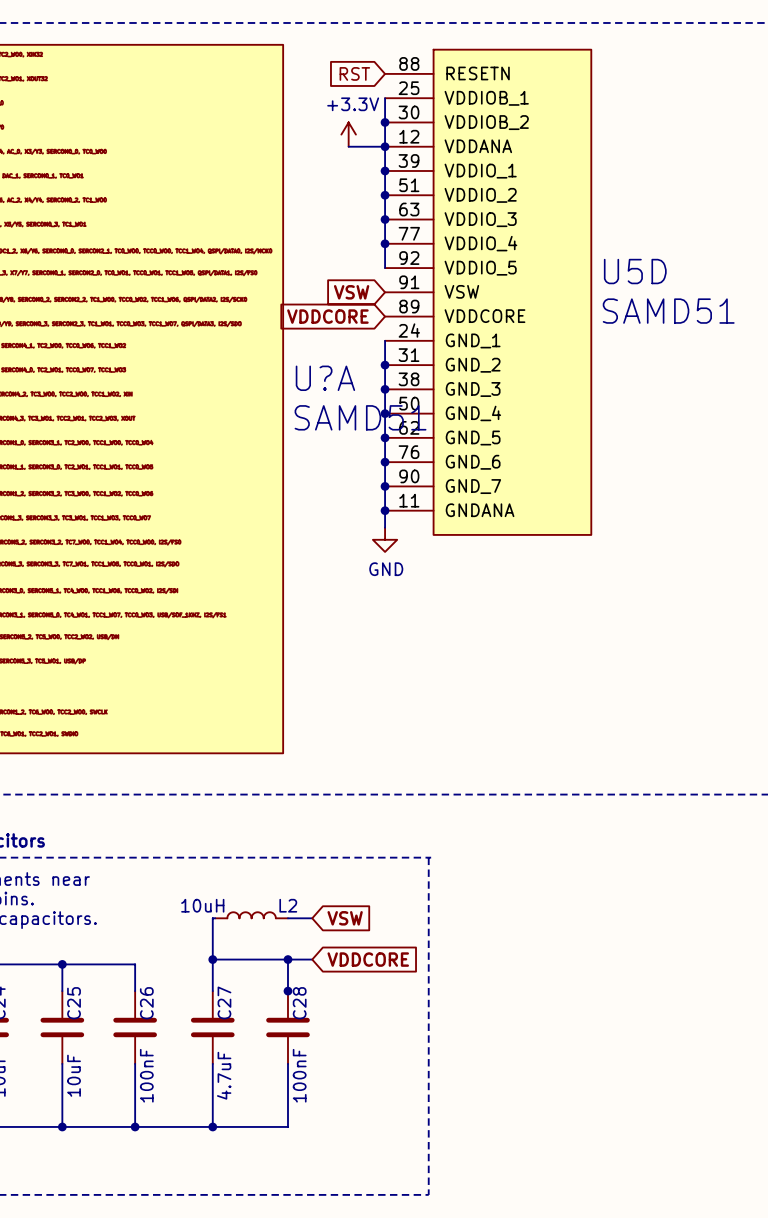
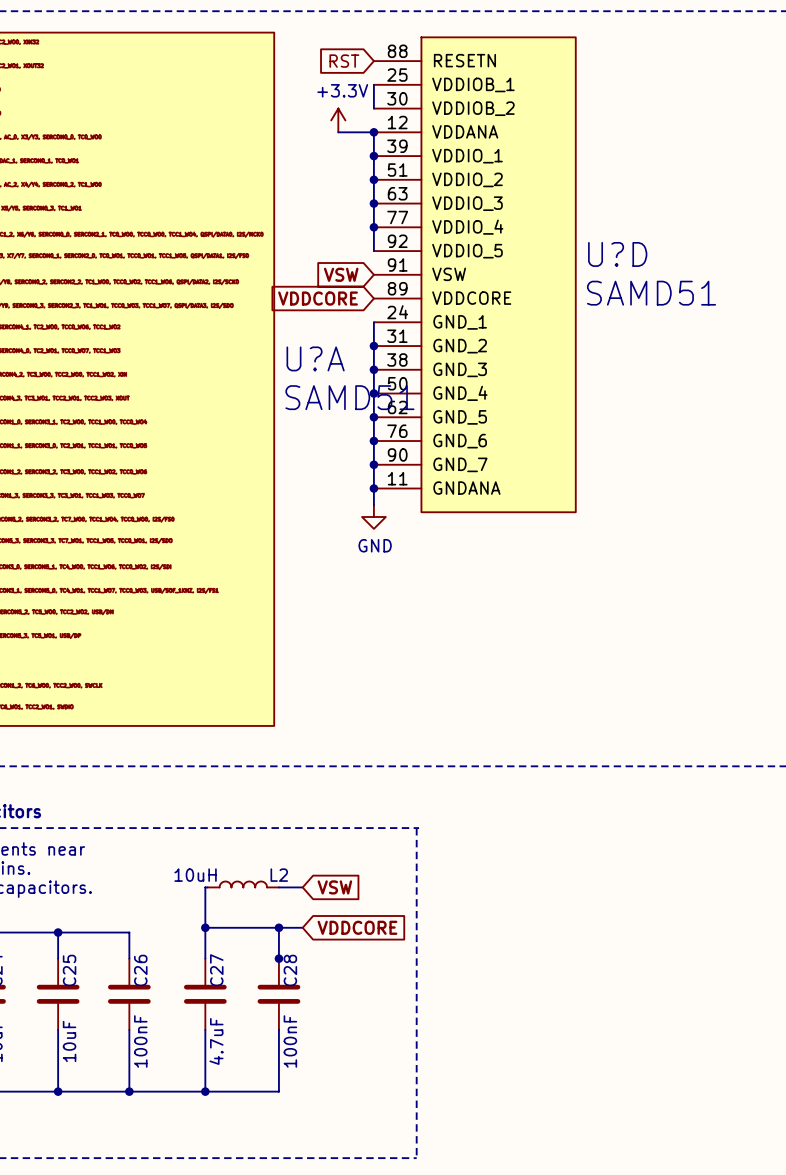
wire: (385, 122) (385, 146) -> none
junction: (385, 122) -> none
U5D name: U5D (635, 271) -> U?D (617, 254)

